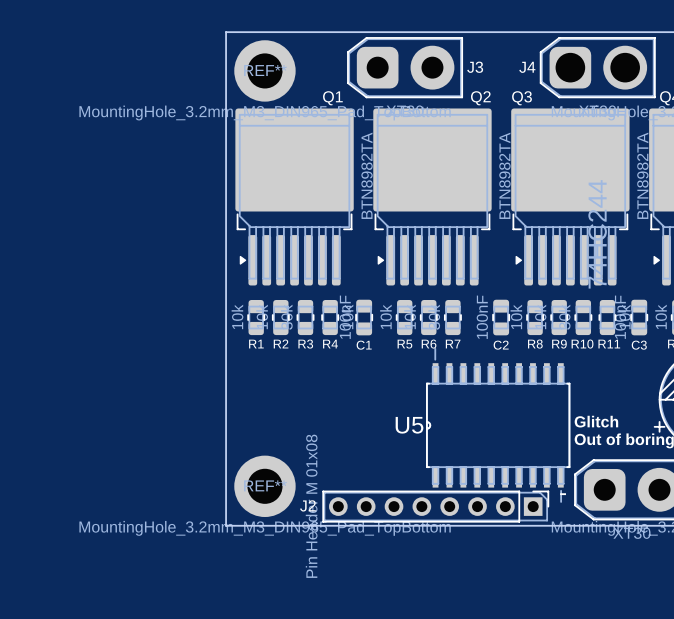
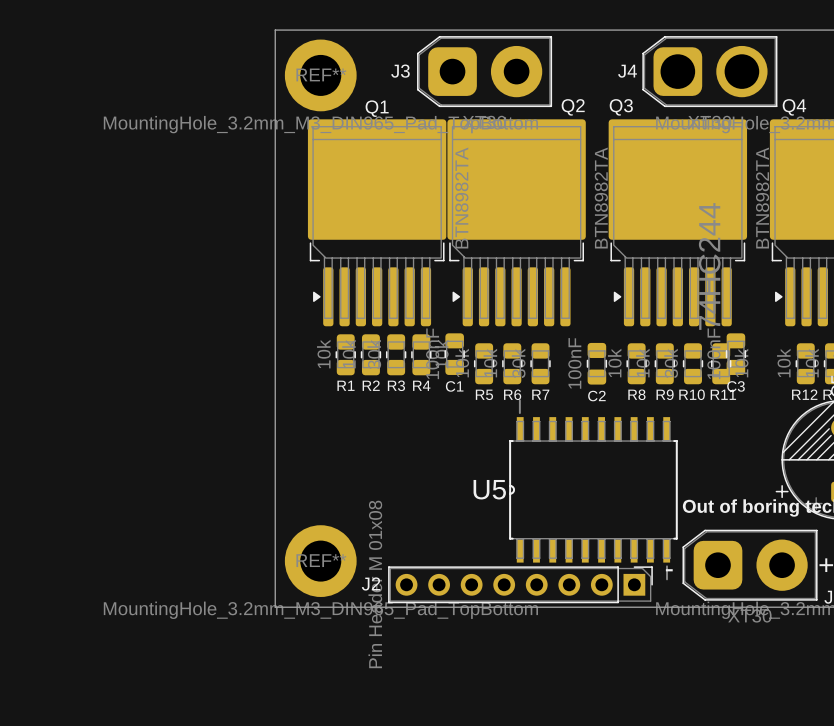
J3 name position: J3 (475, 67) -> J3 (400, 71)
Q1 name position: Q1 (332, 98) -> Q1 (377, 108)
Q1 position: (294, 196) -> (377, 222)
R1 position: (256, 317) -> (345, 354)
R2 position: (280, 317) -> (370, 354)
R3 position: (305, 317) -> (396, 354)
R4 position: (330, 317) -> (421, 354)
C1 position: (364, 317) -> (454, 354)
C3 position: (639, 317) -> (735, 354)
text: Glitch (596, 421) -> none

